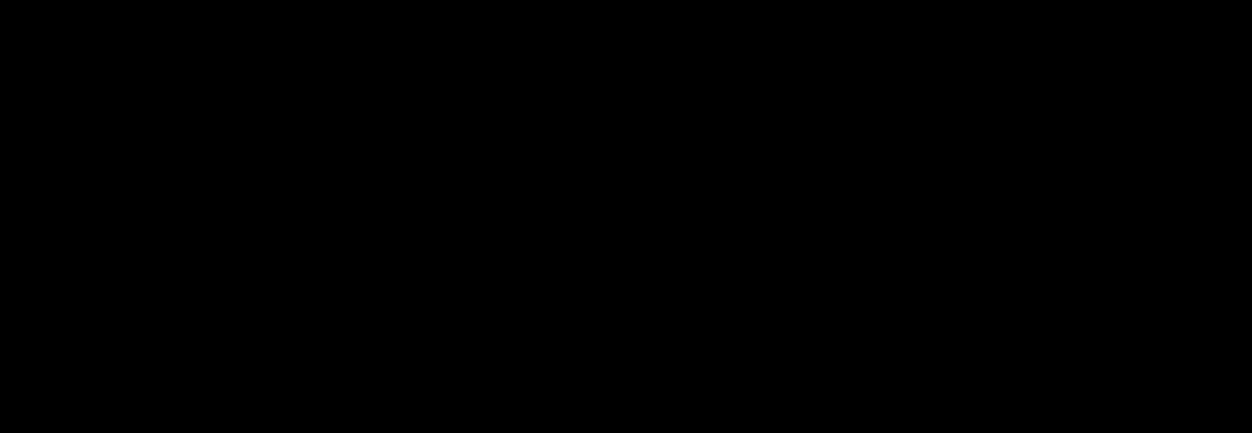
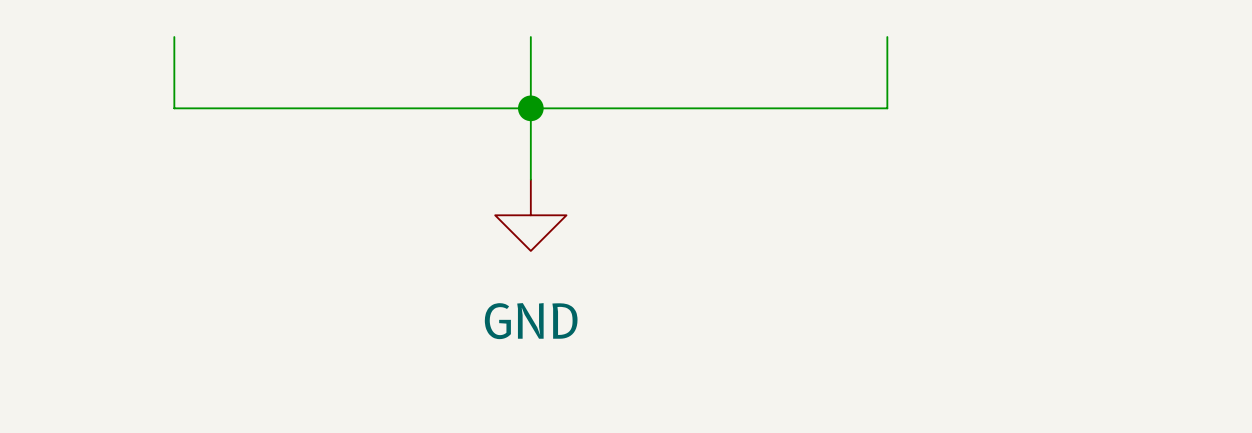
wire: none -> (174, 37) (174, 108) (887, 108) (887, 37)
wire: none -> (530, 37) (530, 179)
junction: none -> (530, 108)
power symbol: none -> GND (530, 215)

